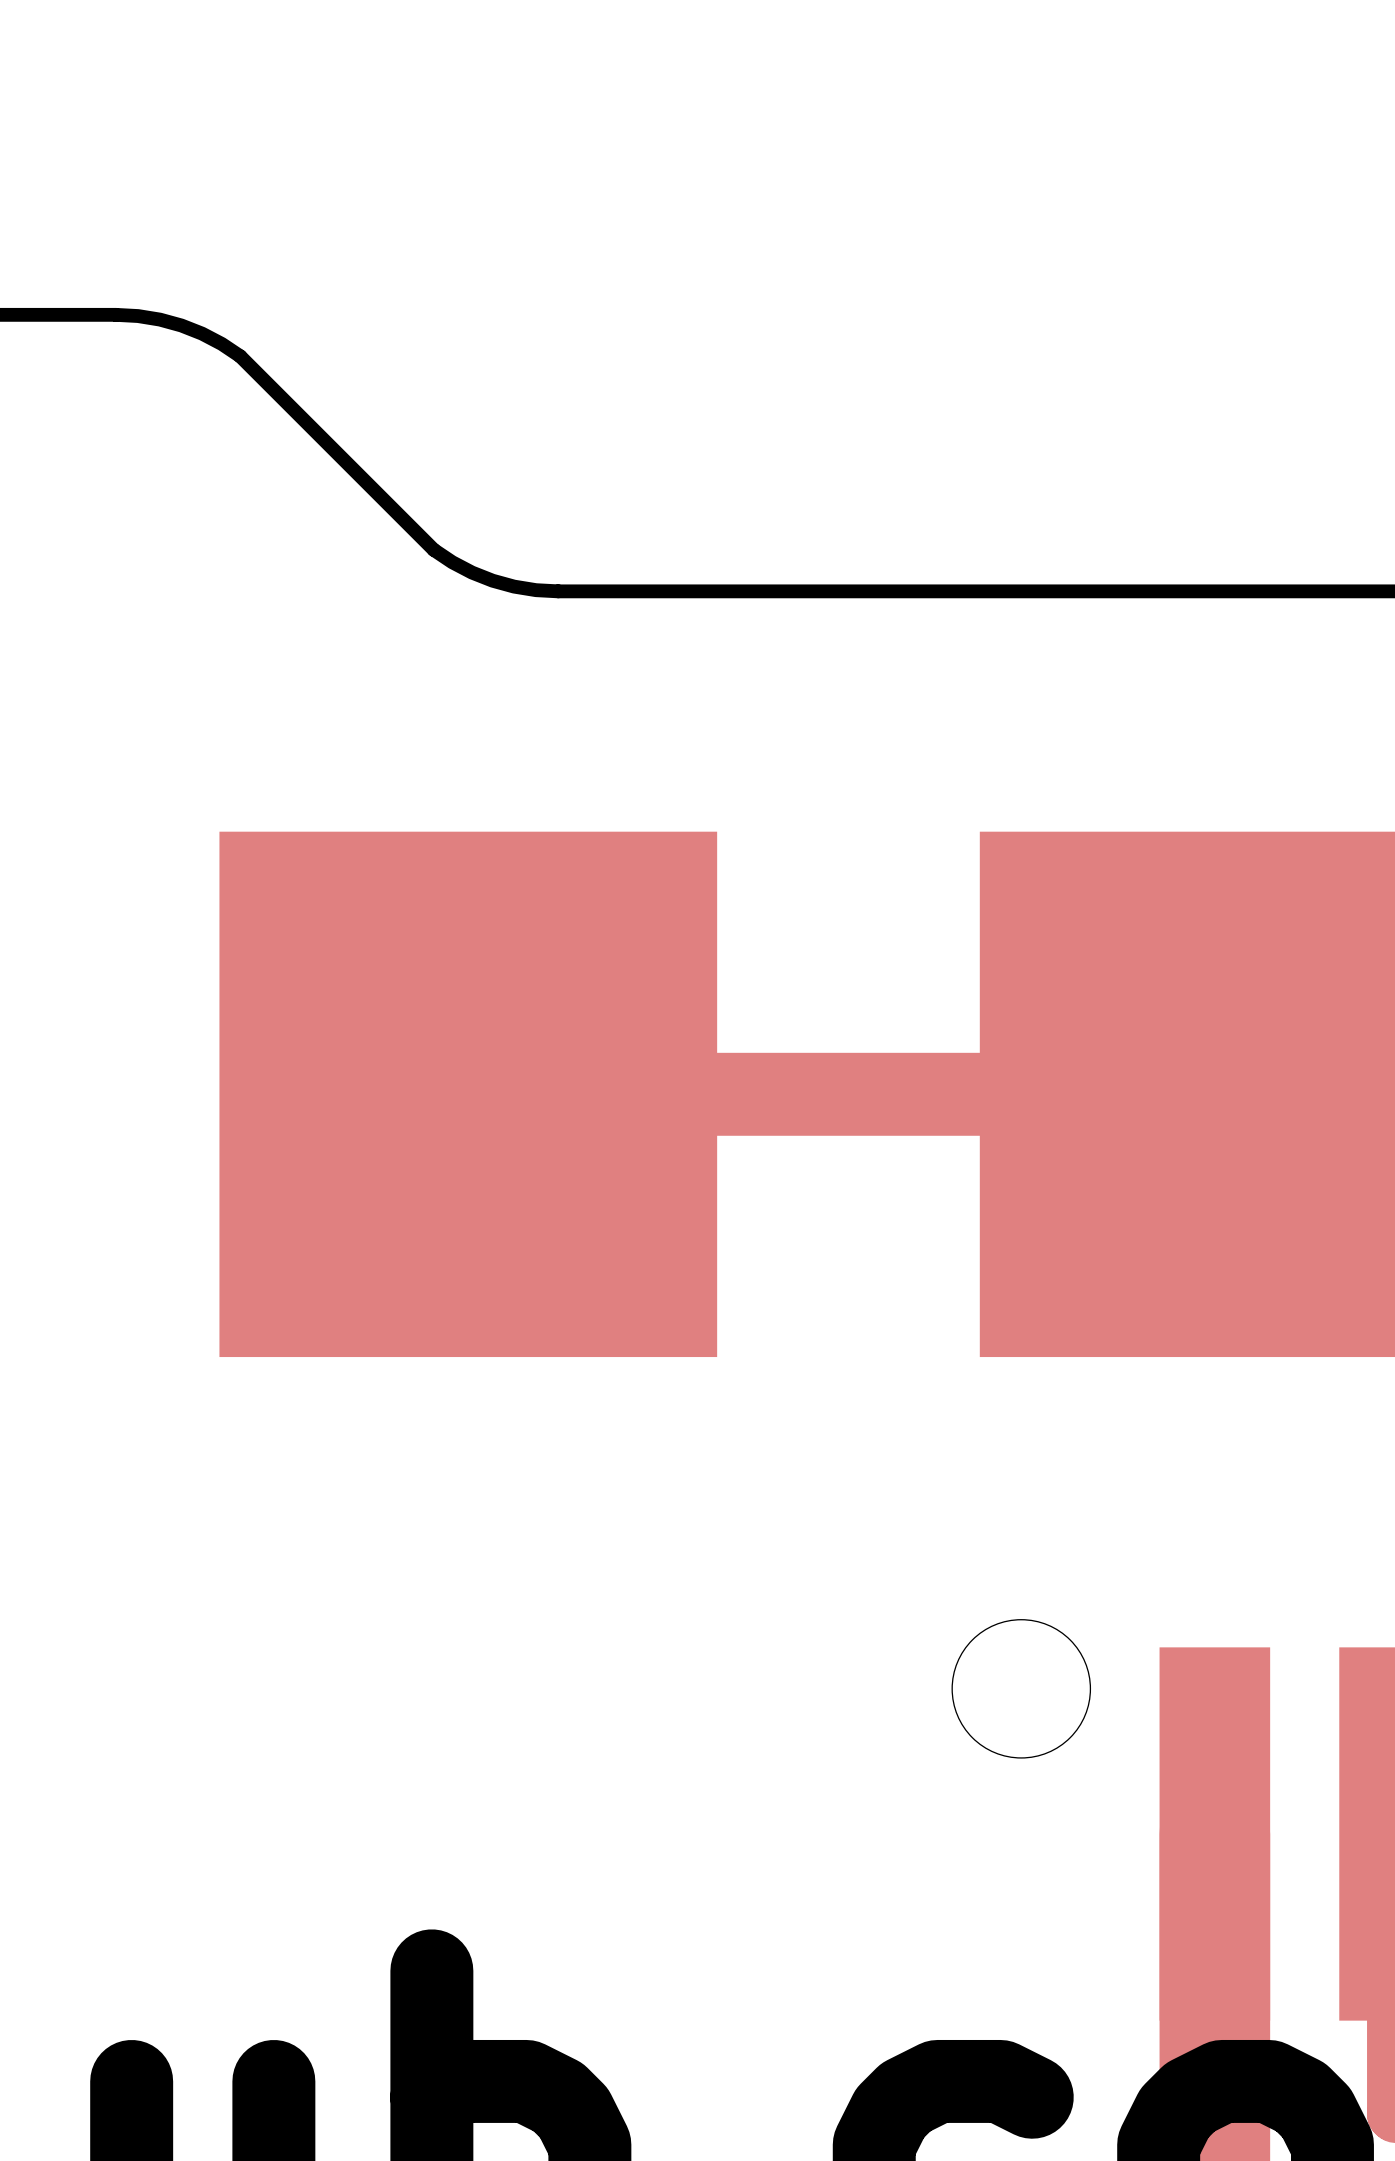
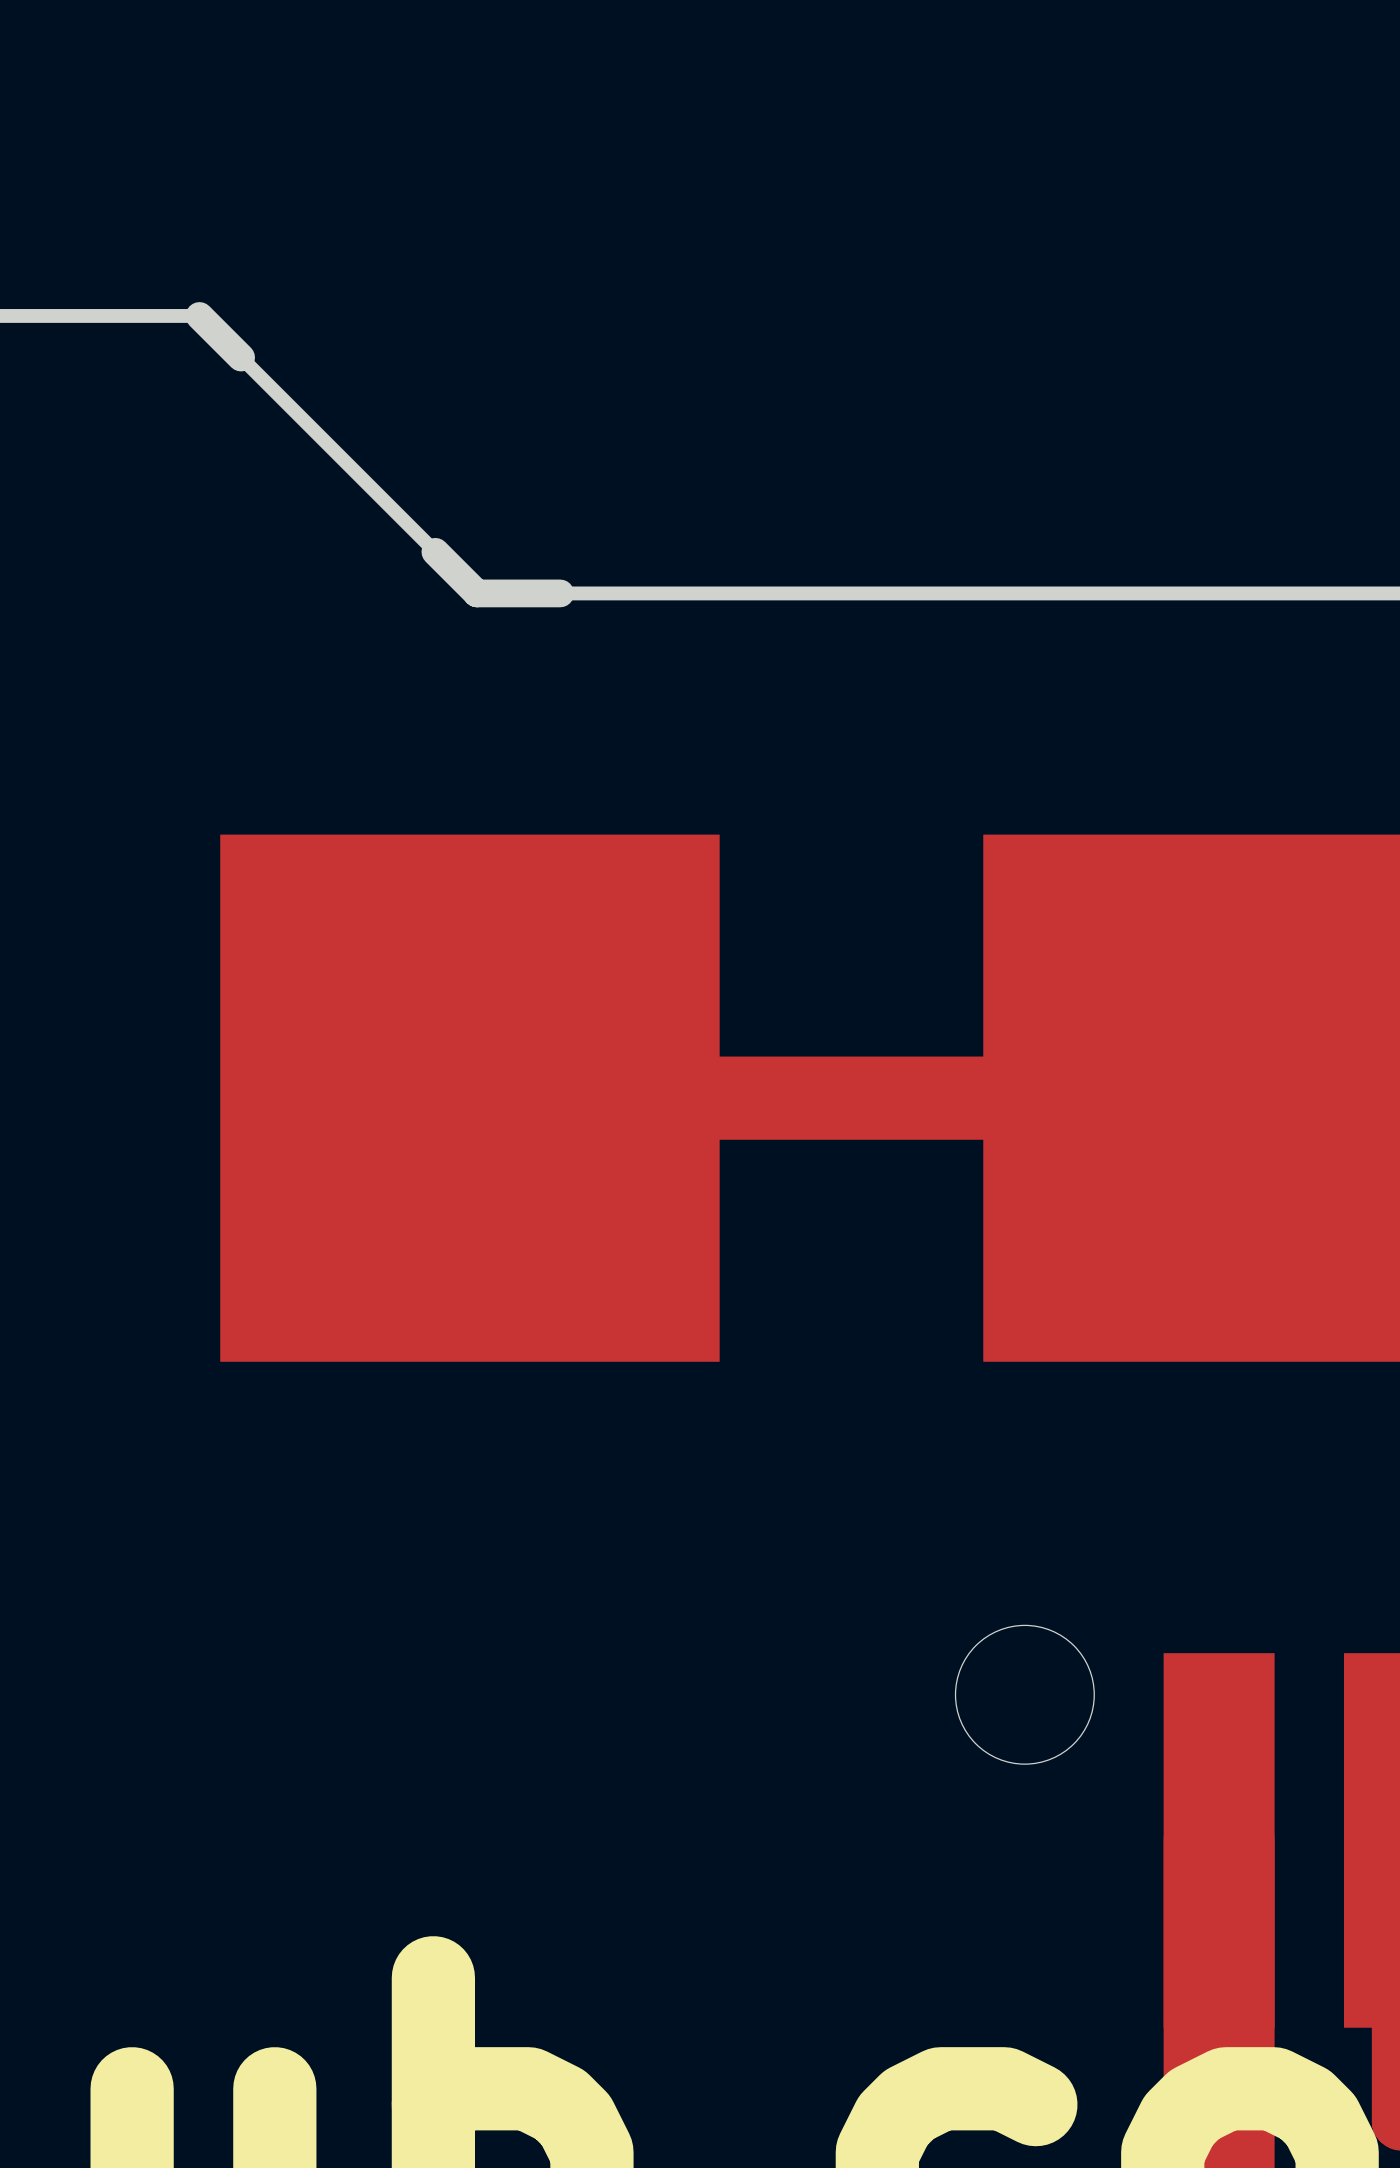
board edge: (115, 314) (160, 319) (181, 325) (202, 333) (240, 356) -> (116, 315) (199, 315) (241, 357)
board edge: (433, 549) (472, 572) (492, 580) (514, 586) (558, 591) -> (435, 551) (476, 593) (560, 593)

